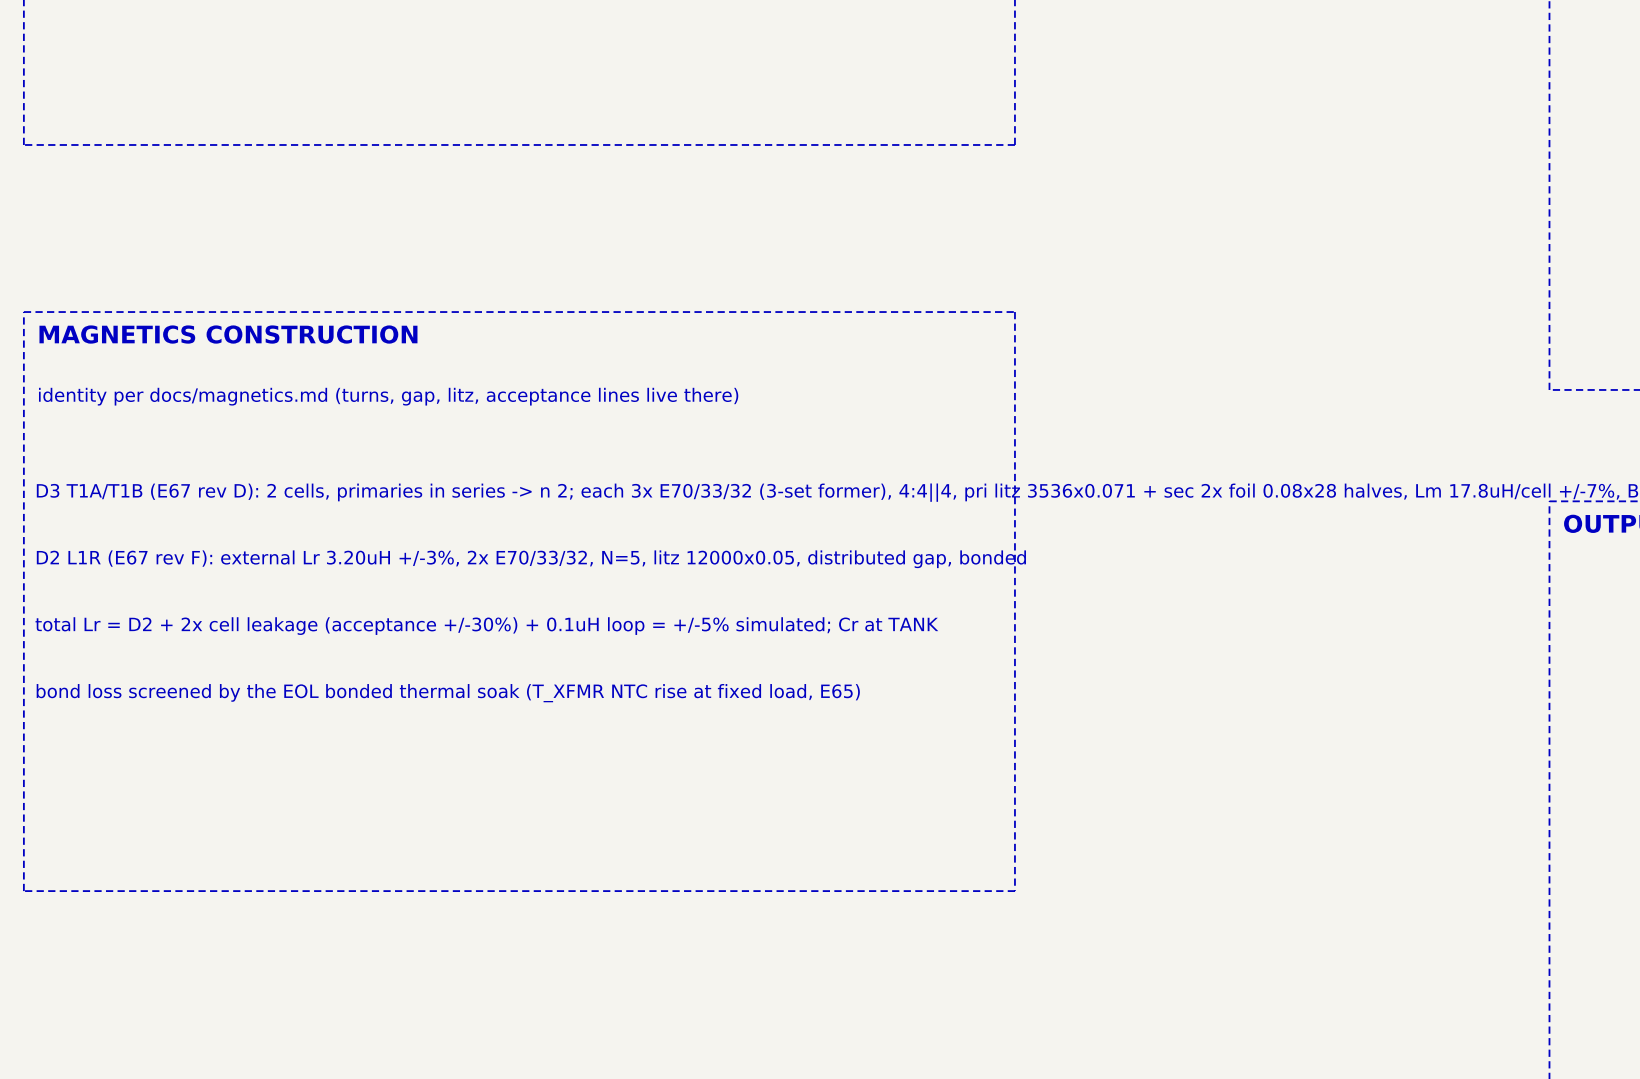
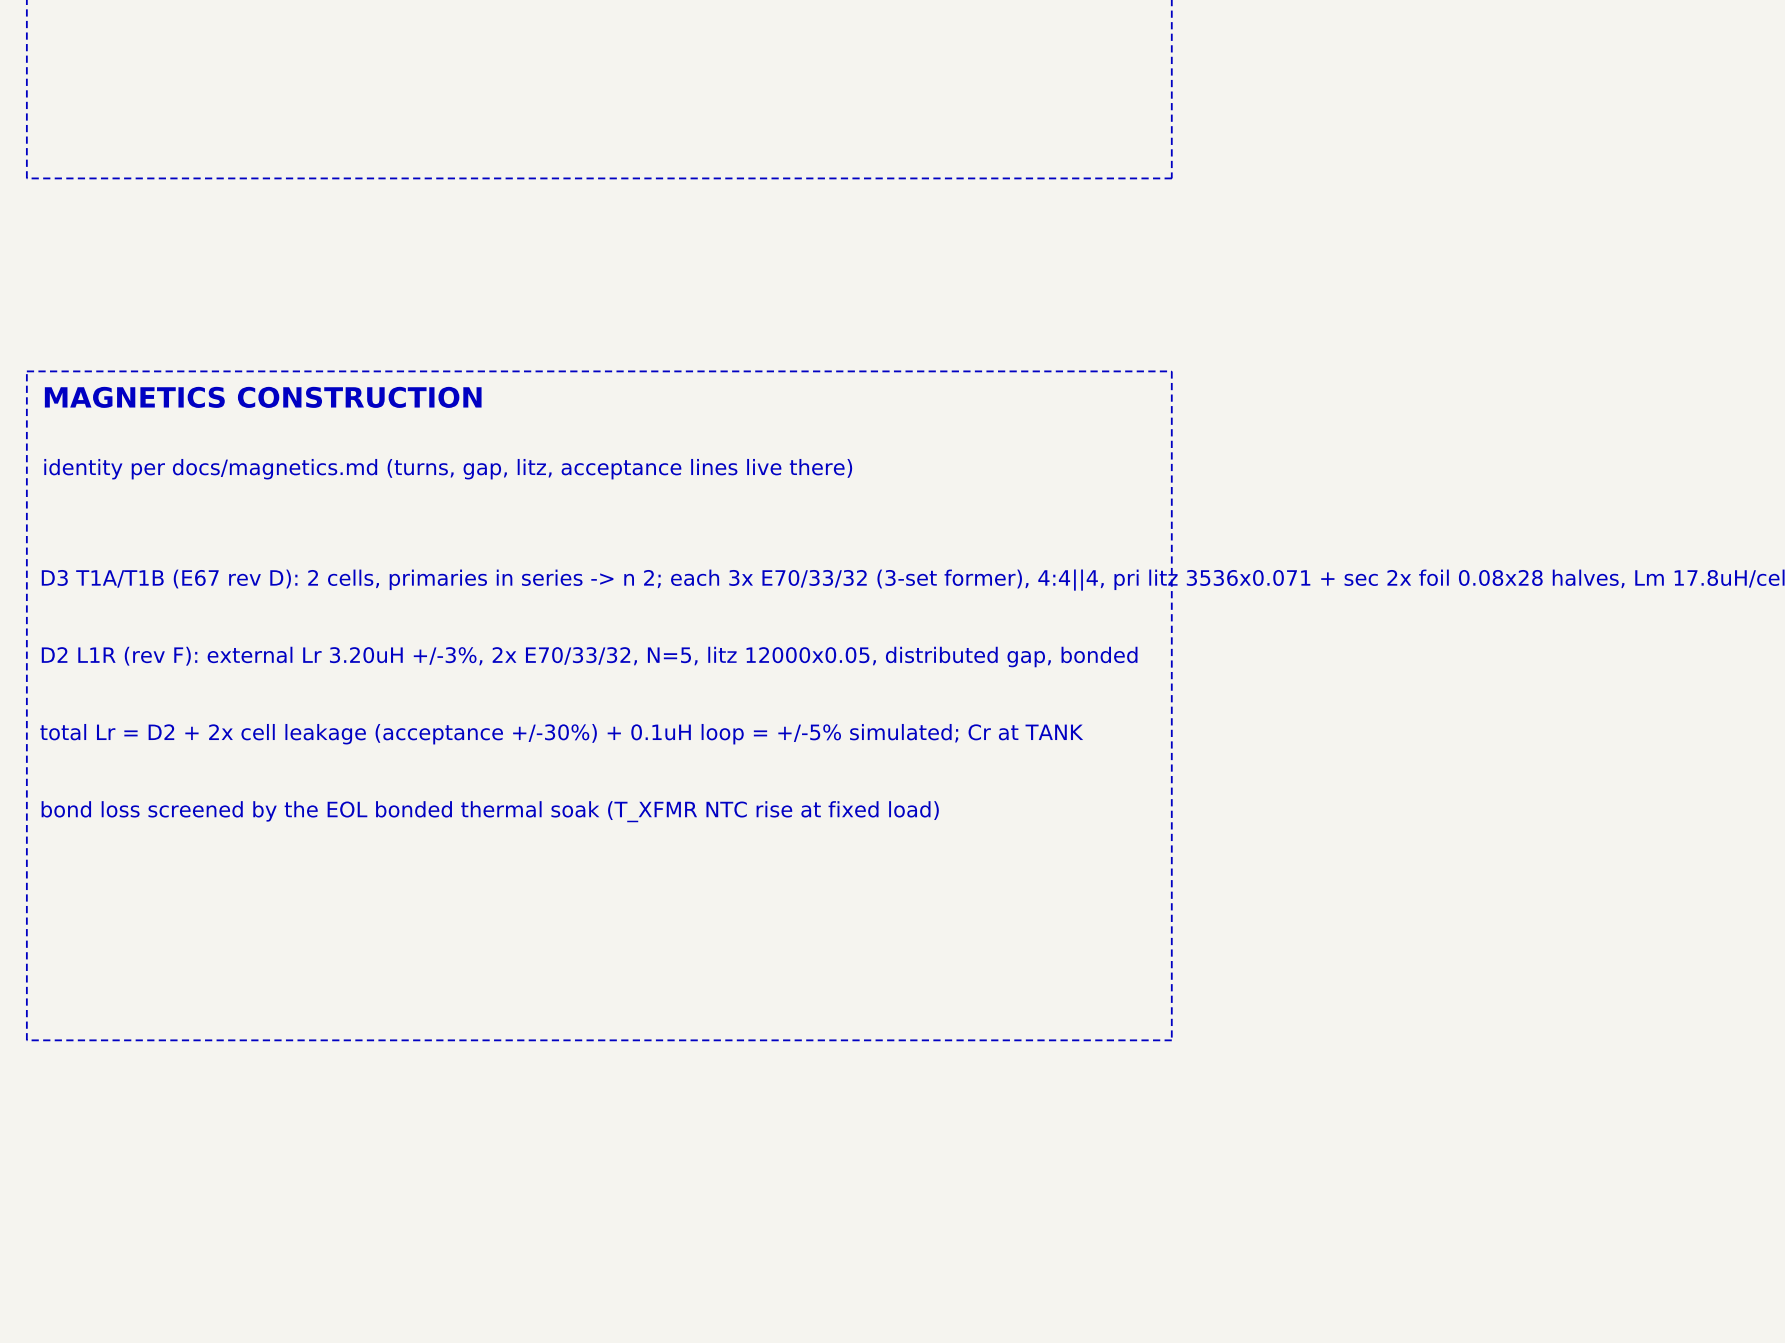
text: D2 L1R (E67 rev F): external Lr 3.20uH +/-3%, 2x E70/33/32, N=5, litz 12000x0.05, distributed gap, bonded (531, 559) -> D2 L1R (rev F): external Lr 3.20uH +/-3%, 2x E70/33/32, N=5, litz 12000x0.05, distributed gap, bonded (589, 657)
text: bond loss screened by the EOL bonded thermal soak (T_XFMR NTC rise at fixed load, E65) (448, 693) -> bond loss screened by the EOL bonded thermal soak (T_XFMR NTC rise at fixed load) (490, 811)

